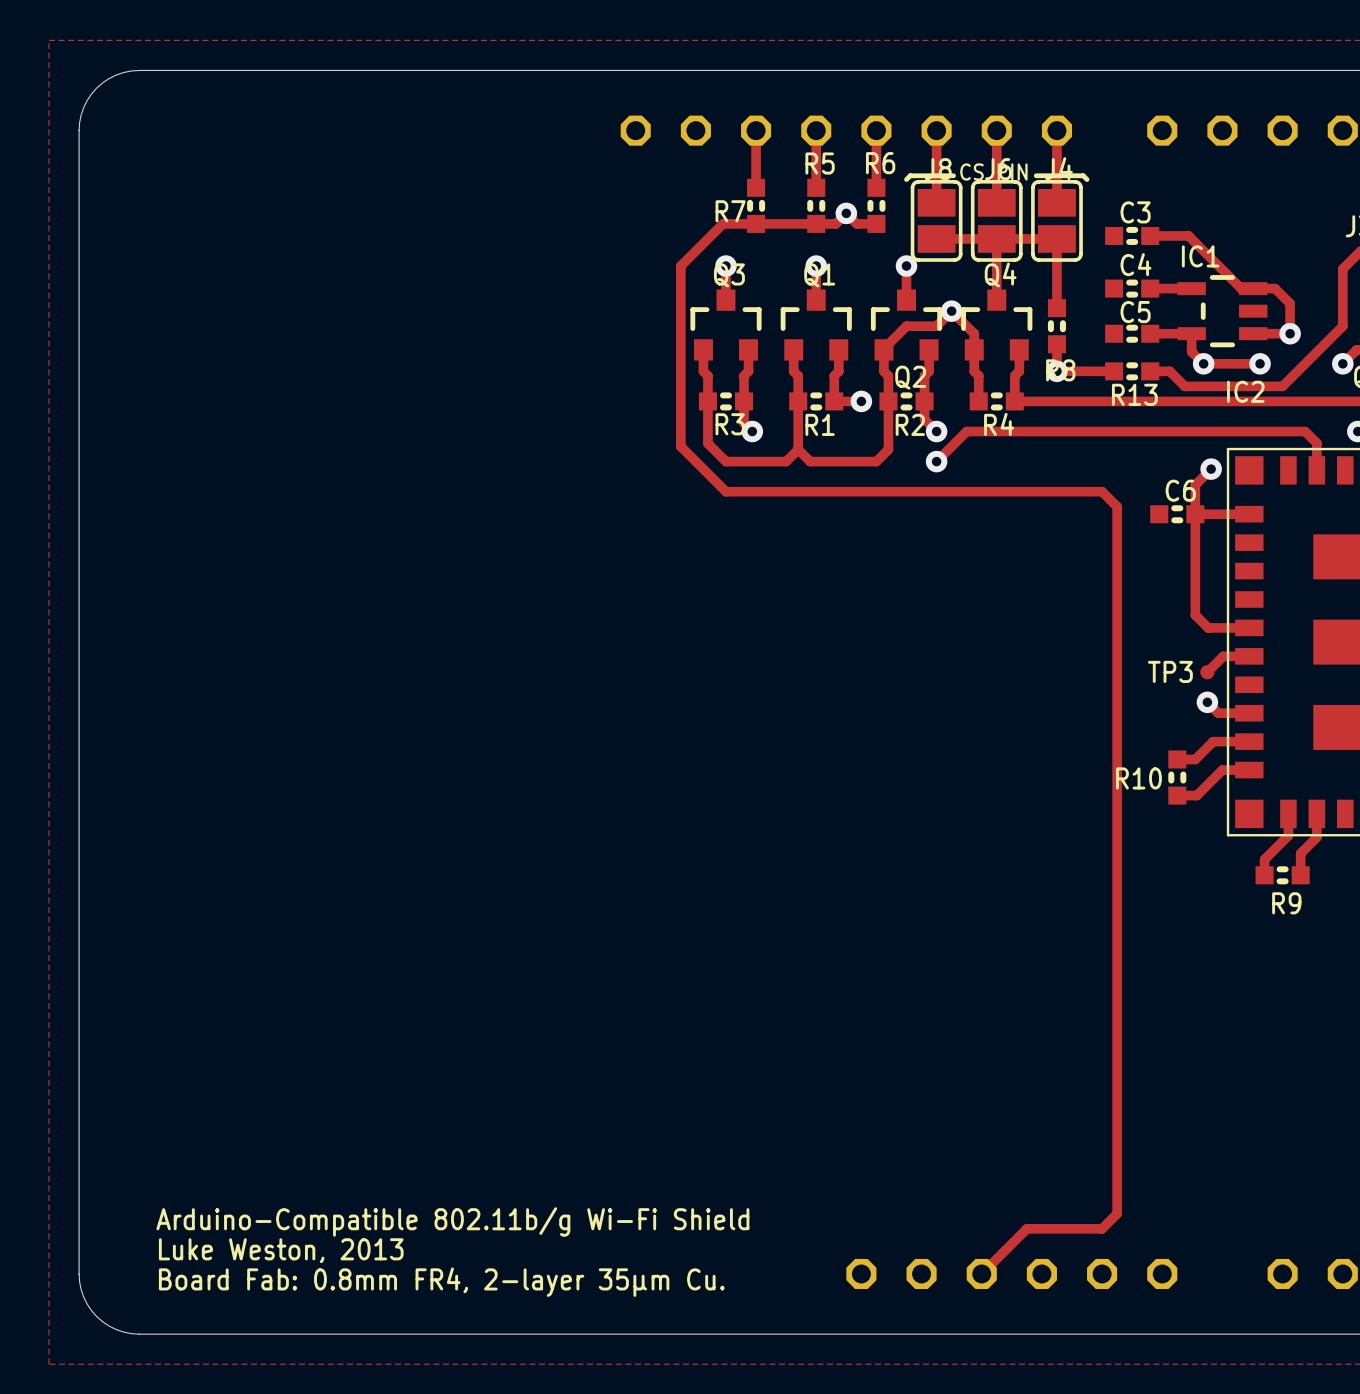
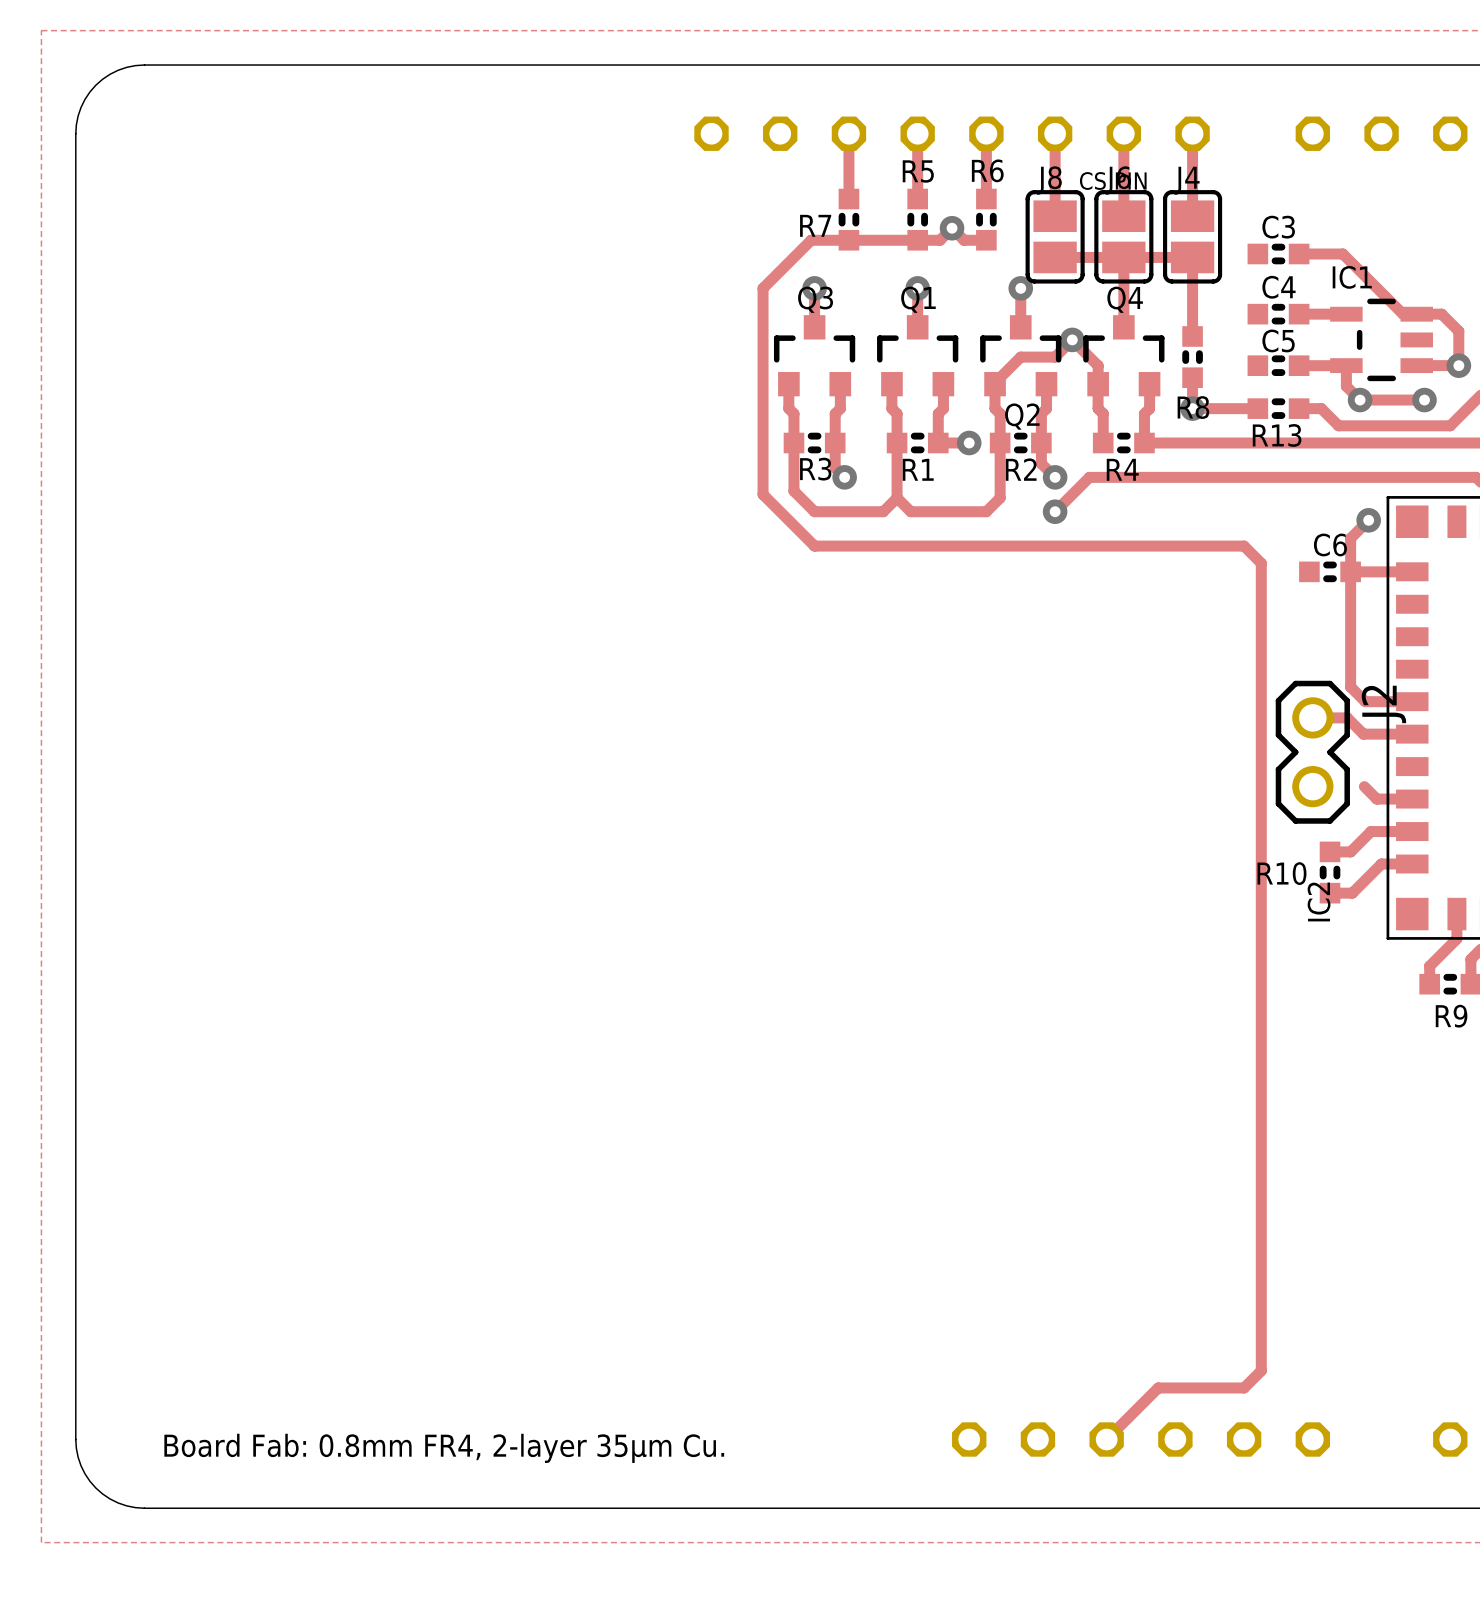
line: (953, 175) (910, 175) (906, 179) -> none
line: (1036, 175) (1083, 175) (1087, 179) -> none
IC2 name rotation: 0° (1245, 391) -> 90° counterclockwise (1319, 901)
IC2 name position: IC2 (1245, 391) -> IC2 (1319, 901)
track: (1223, 656) (1207, 672) -> (1382, 734) (1363, 734) (1347, 717) (1312, 717)
J2: none -> (1312, 752)
TP3: (1207, 672) -> none
via: (1207, 702) -> none
text: Arduino-Compatible 802.11b/g Wi-Fi Shield (452, 1221) -> none
text: Luke Weston, 2013 (281, 1250) -> none

